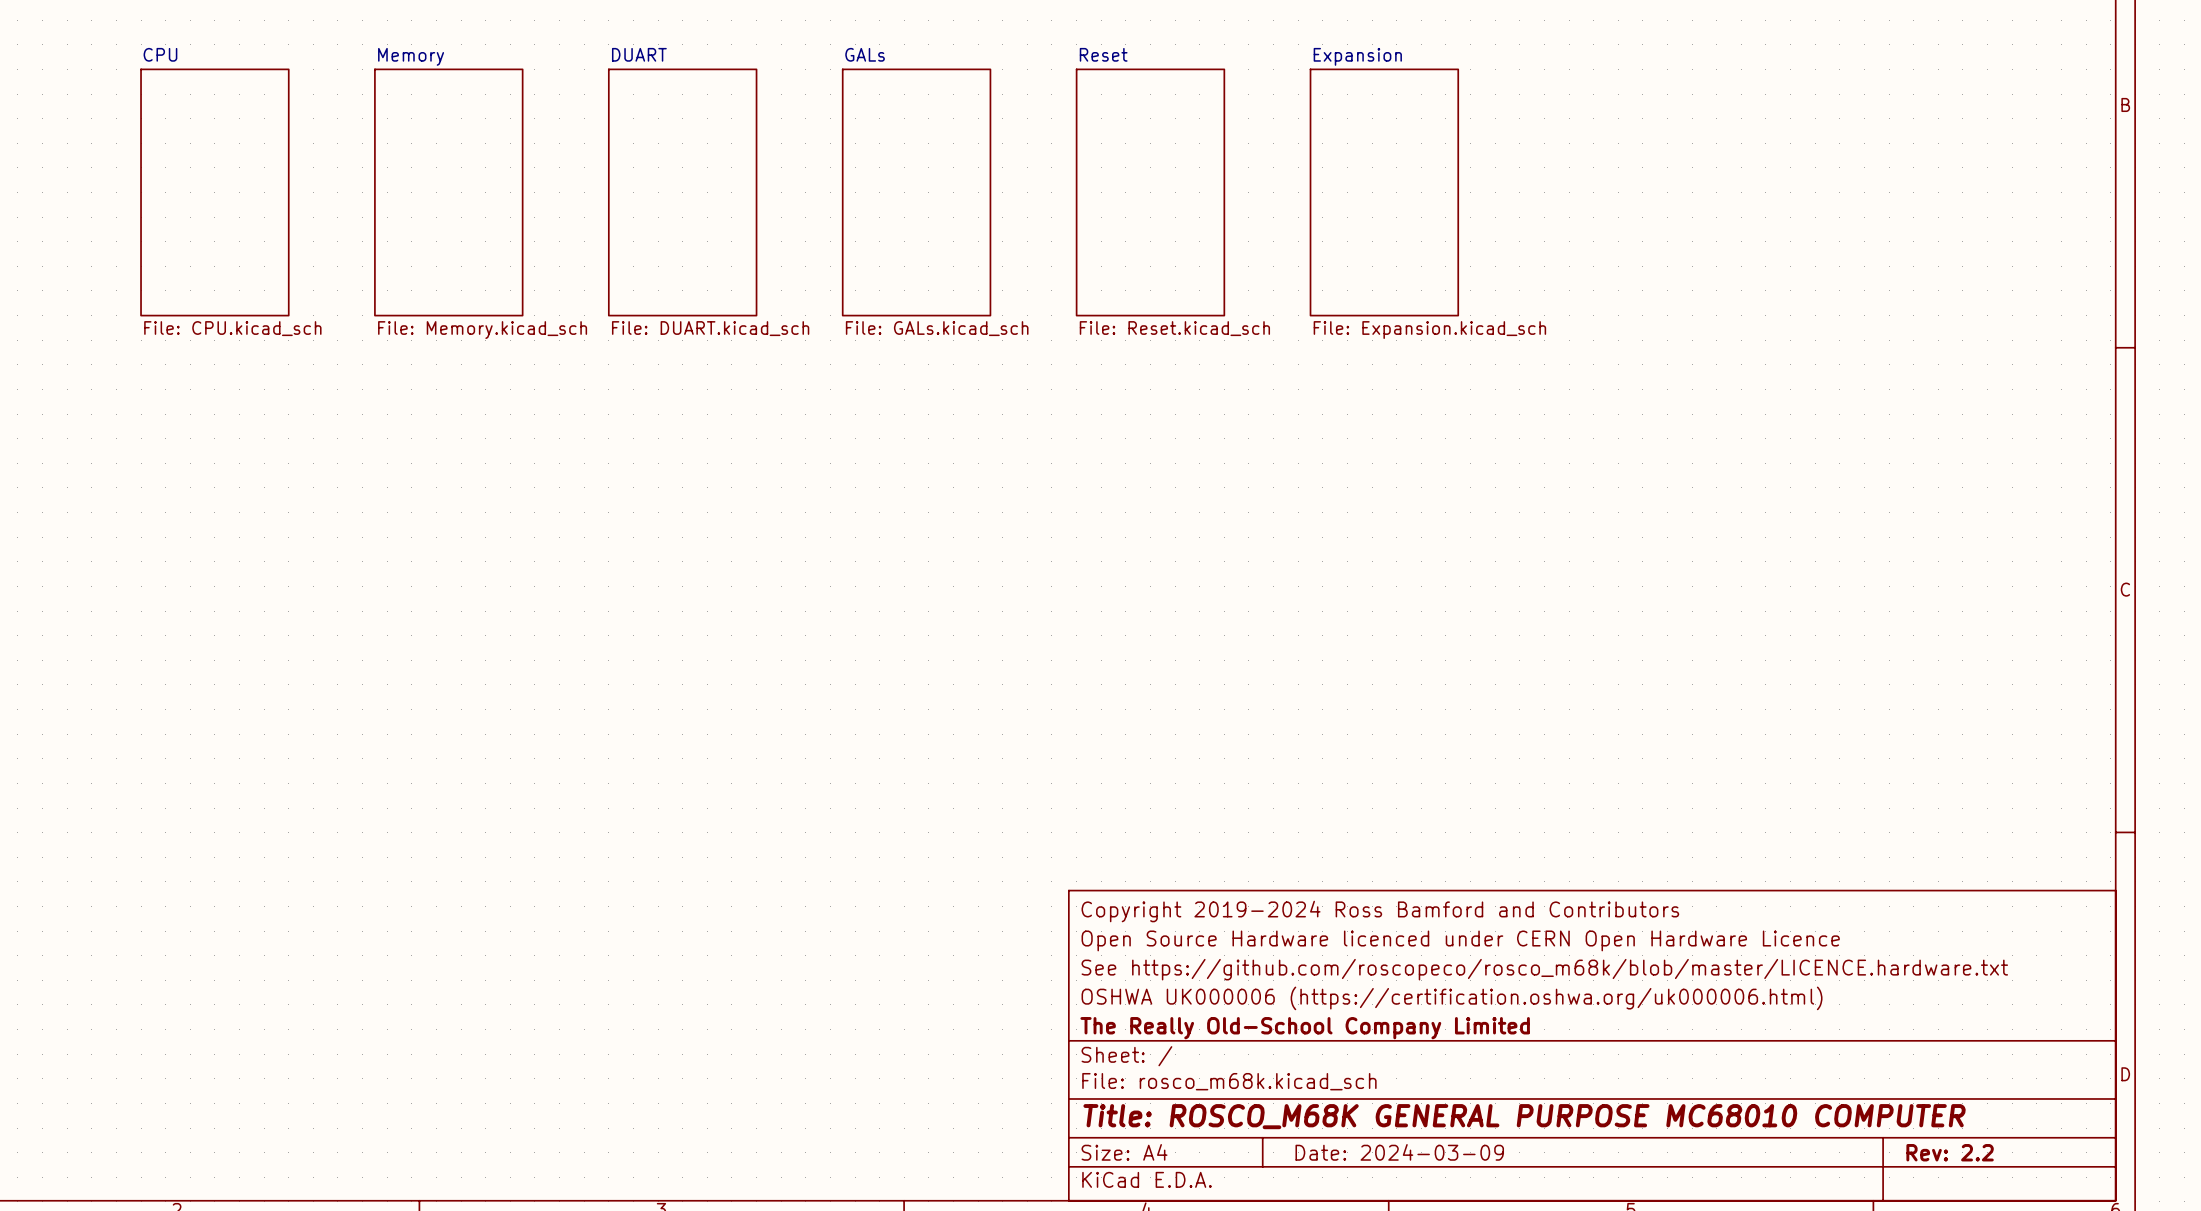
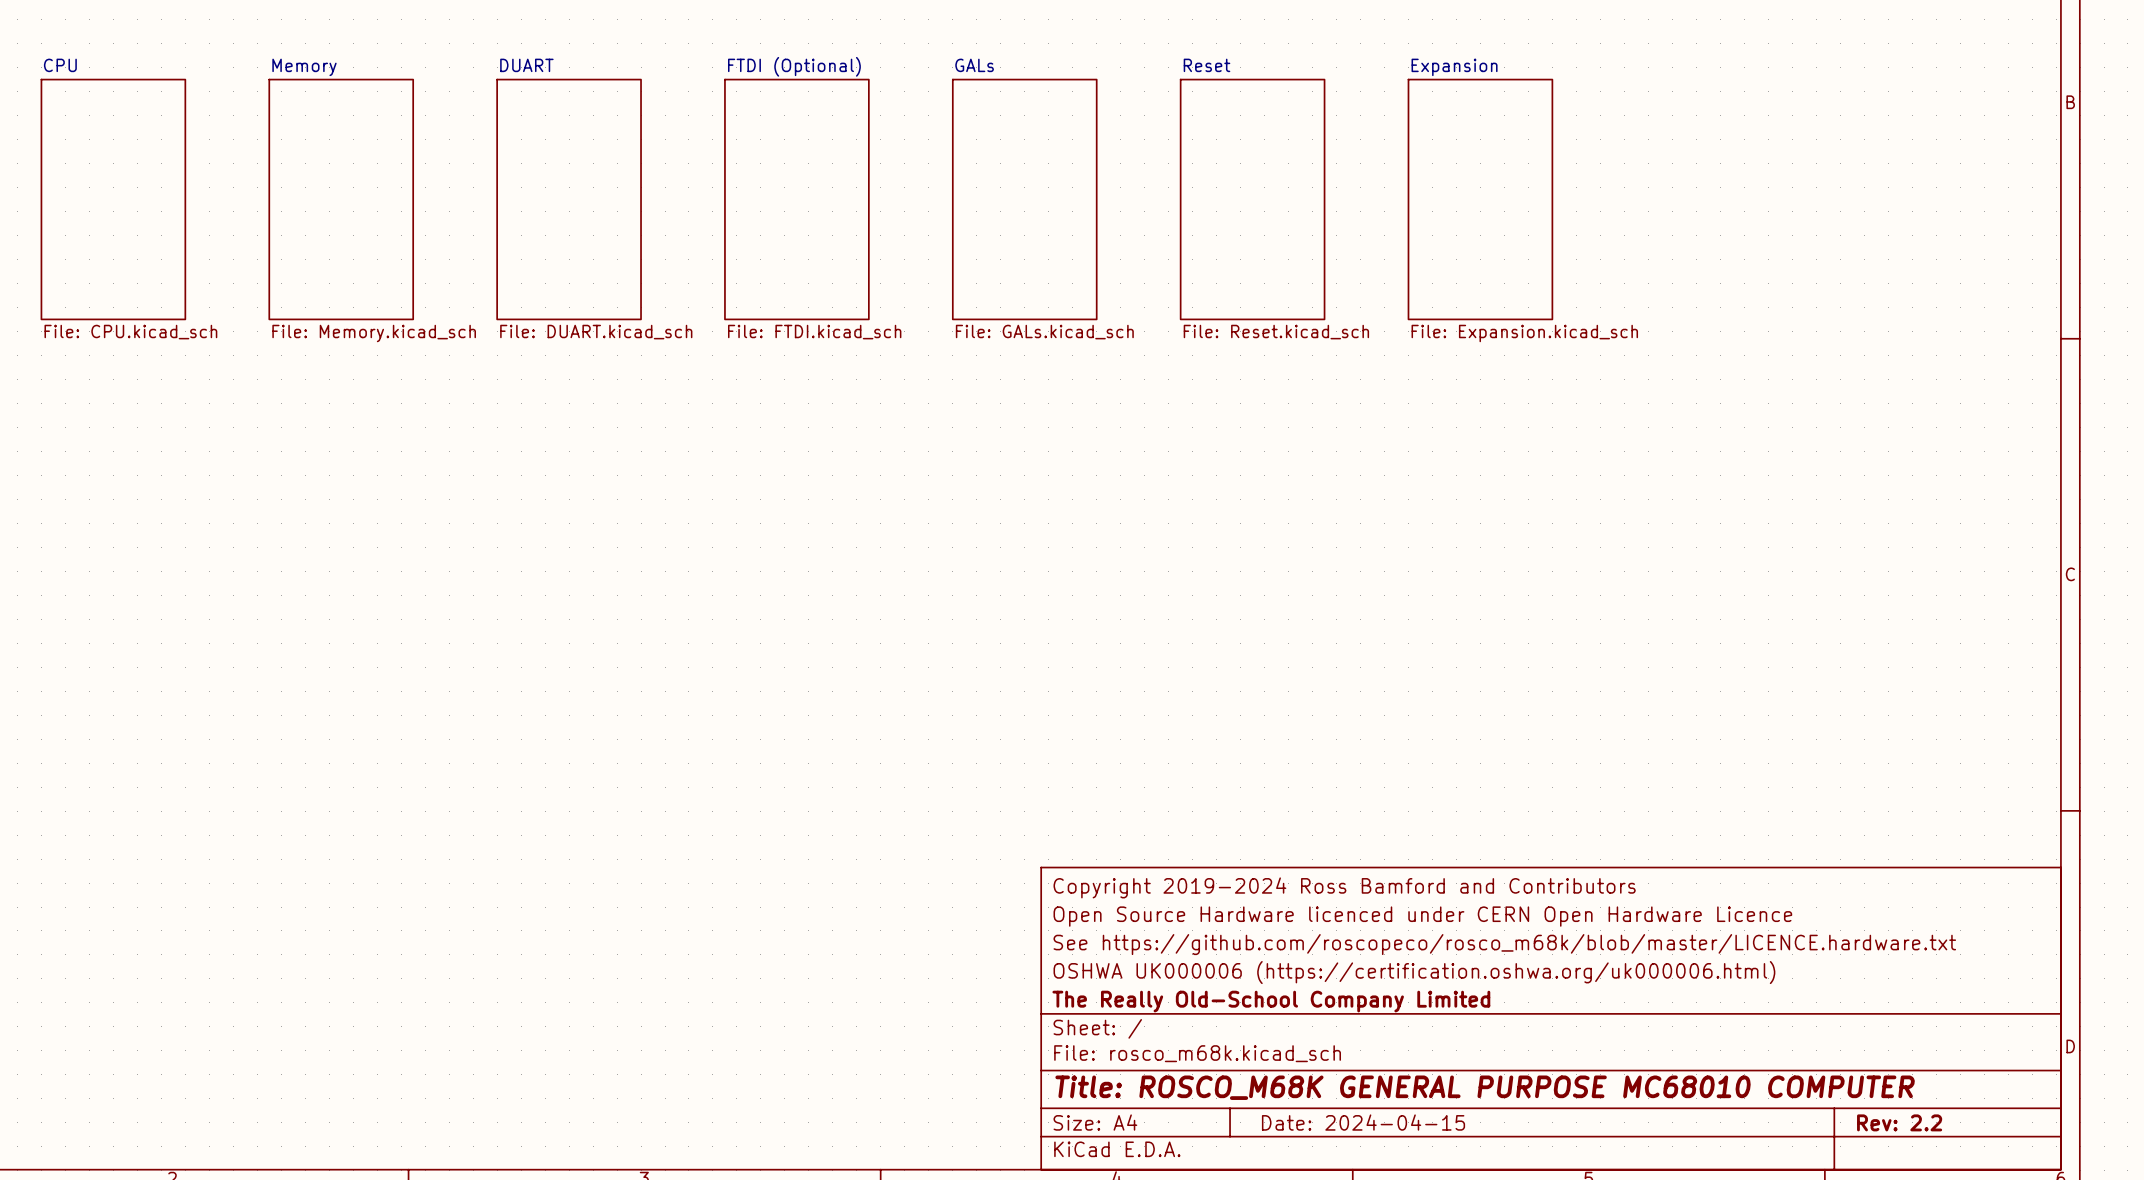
sheet CPU position: (214, 192) -> (113, 199)
sheet Memory position: (448, 192) -> (341, 199)
sheet DUART position: (682, 192) -> (569, 199)
sheet GALs position: (916, 192) -> (1024, 199)
sheet Reset position: (1150, 192) -> (1252, 199)
sheet Expansion position: (1384, 192) -> (1480, 199)
sheet FTDI (Optional): none -> File: FTDI.kicad_sch (796, 199)
title block: Date: 2024-03-09 (1399, 1152) -> Date: 2024-04-15 (1363, 1122)

